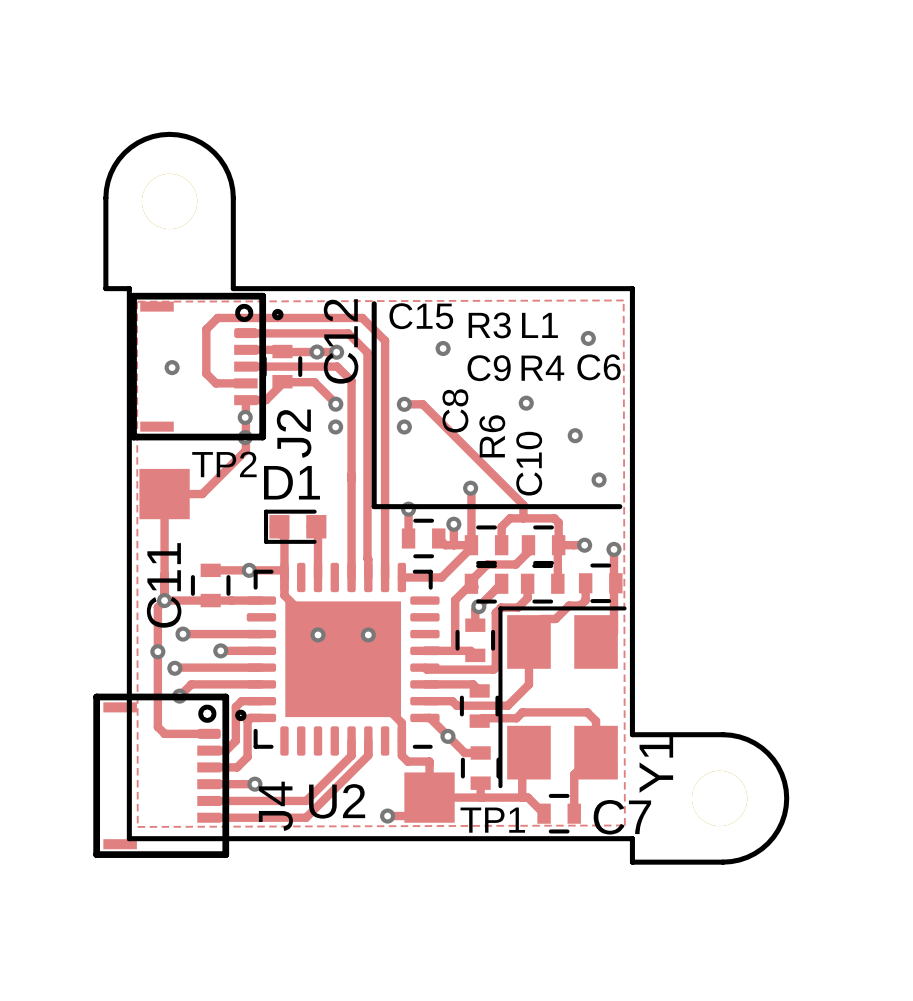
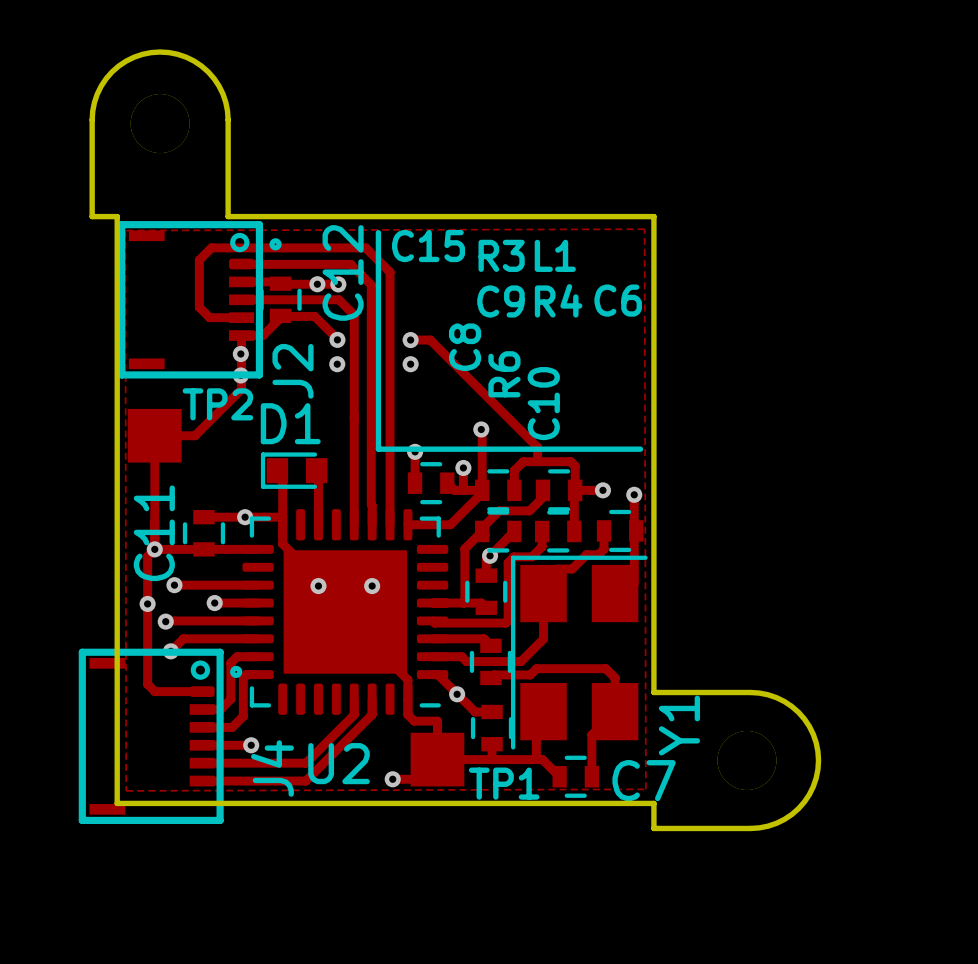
via: (588, 338) -> none
via: (443, 348) -> none
via: (172, 367) -> none
via: (526, 403) -> none
via: (575, 435) -> none
via: (599, 479) -> none

